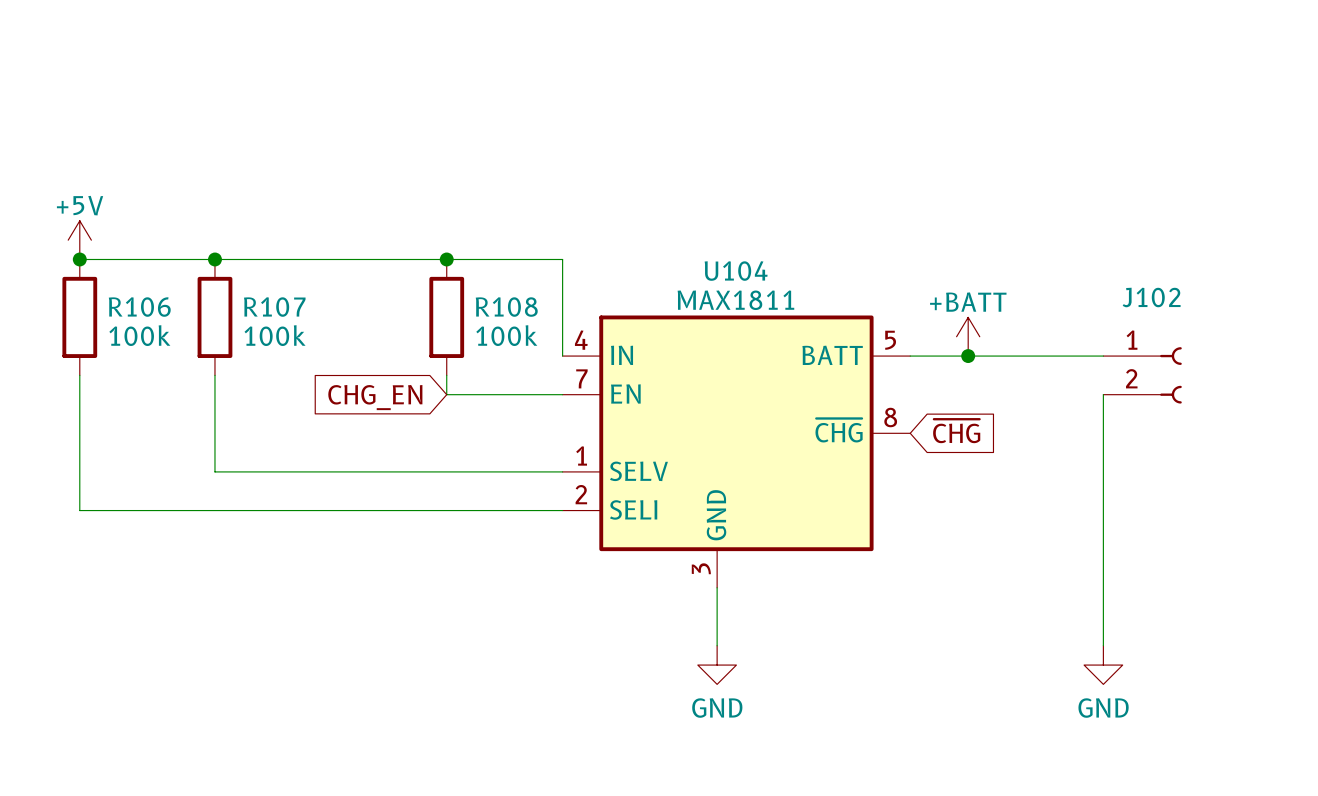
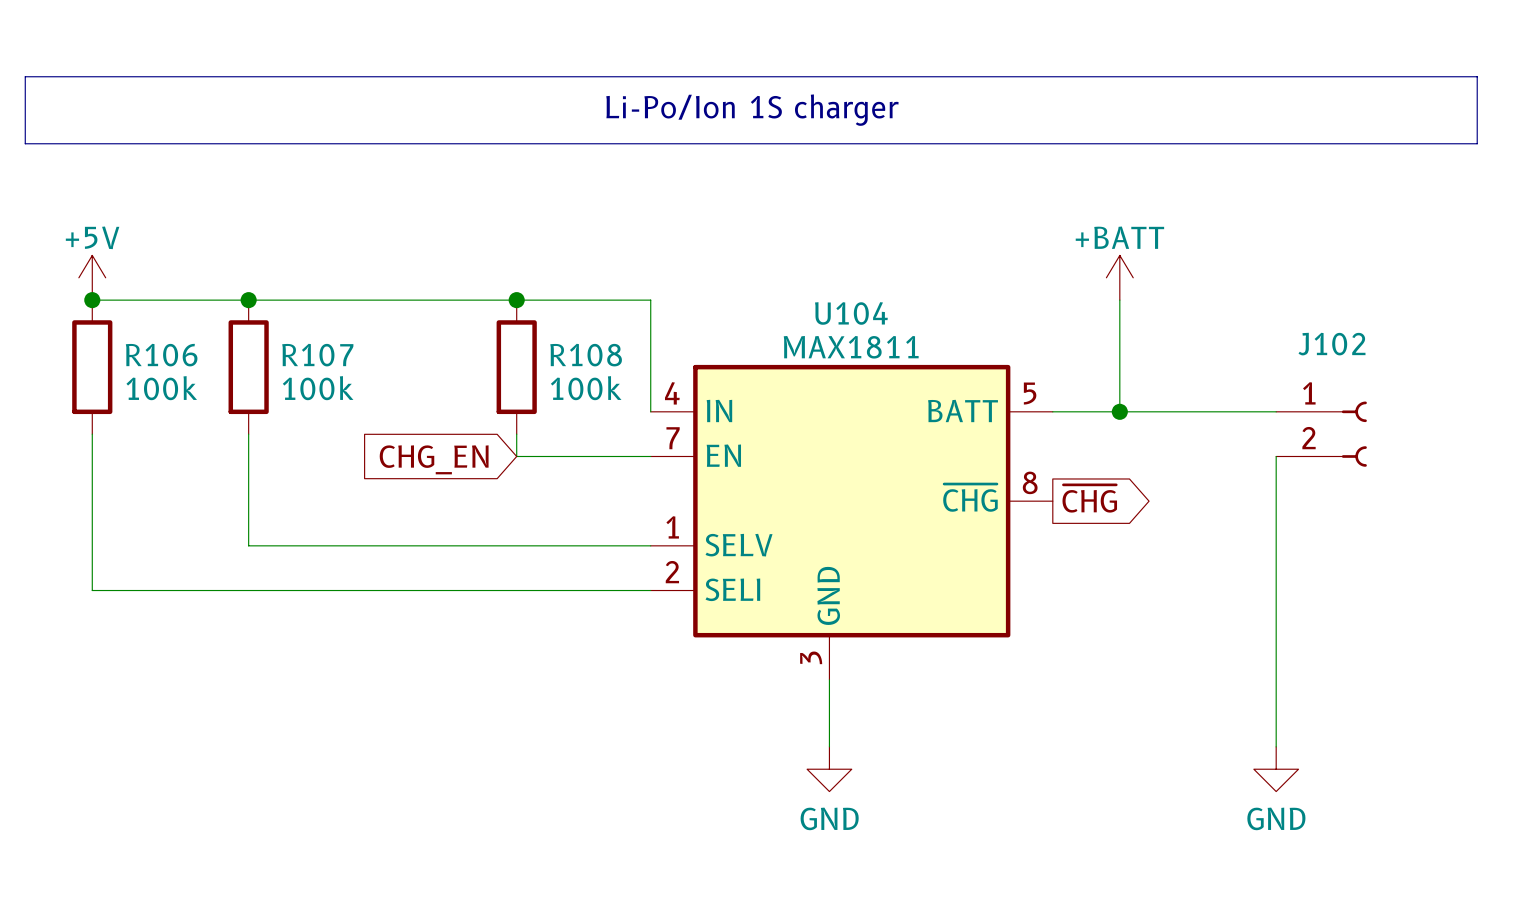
line: none -> (25, 76) (1477, 76) (1477, 143) (25, 143) (25, 76)
text: none -> Li-Po/Ion 1S charger (752, 110)
wire: none -> (1119, 300) (1119, 411)
power symbol position: +BATT (968, 336) -> +BATT (1119, 277)
global label shape: input (956, 431) -> output (1089, 498)

